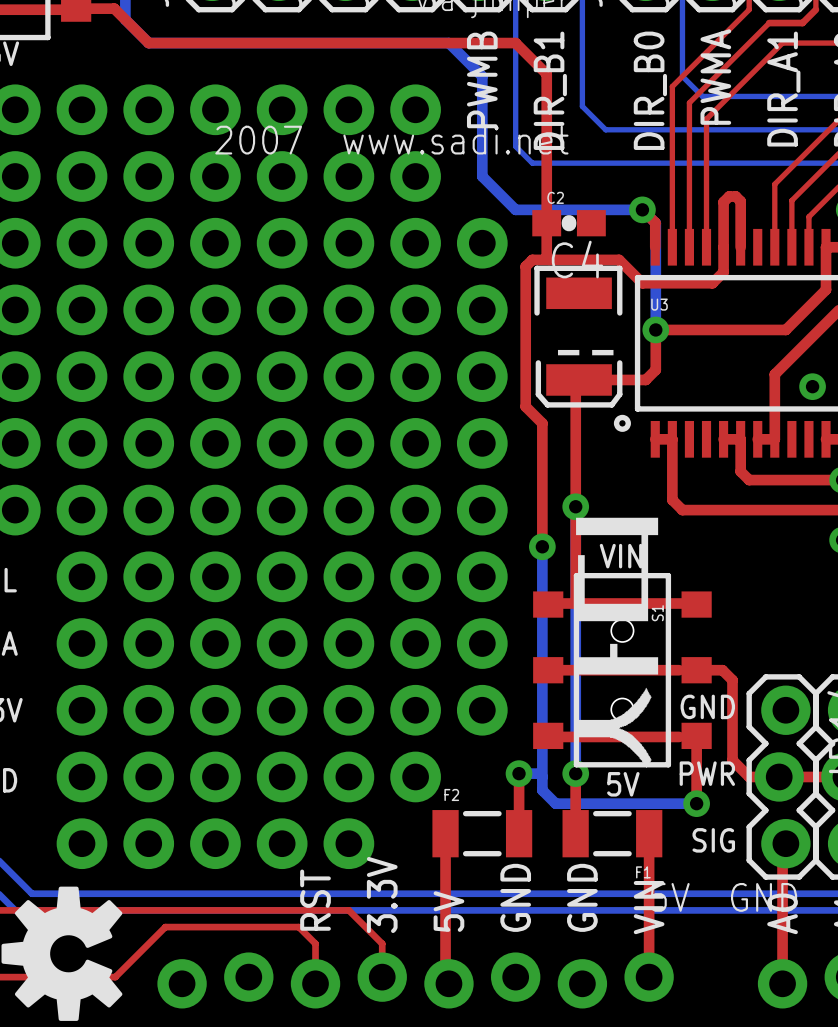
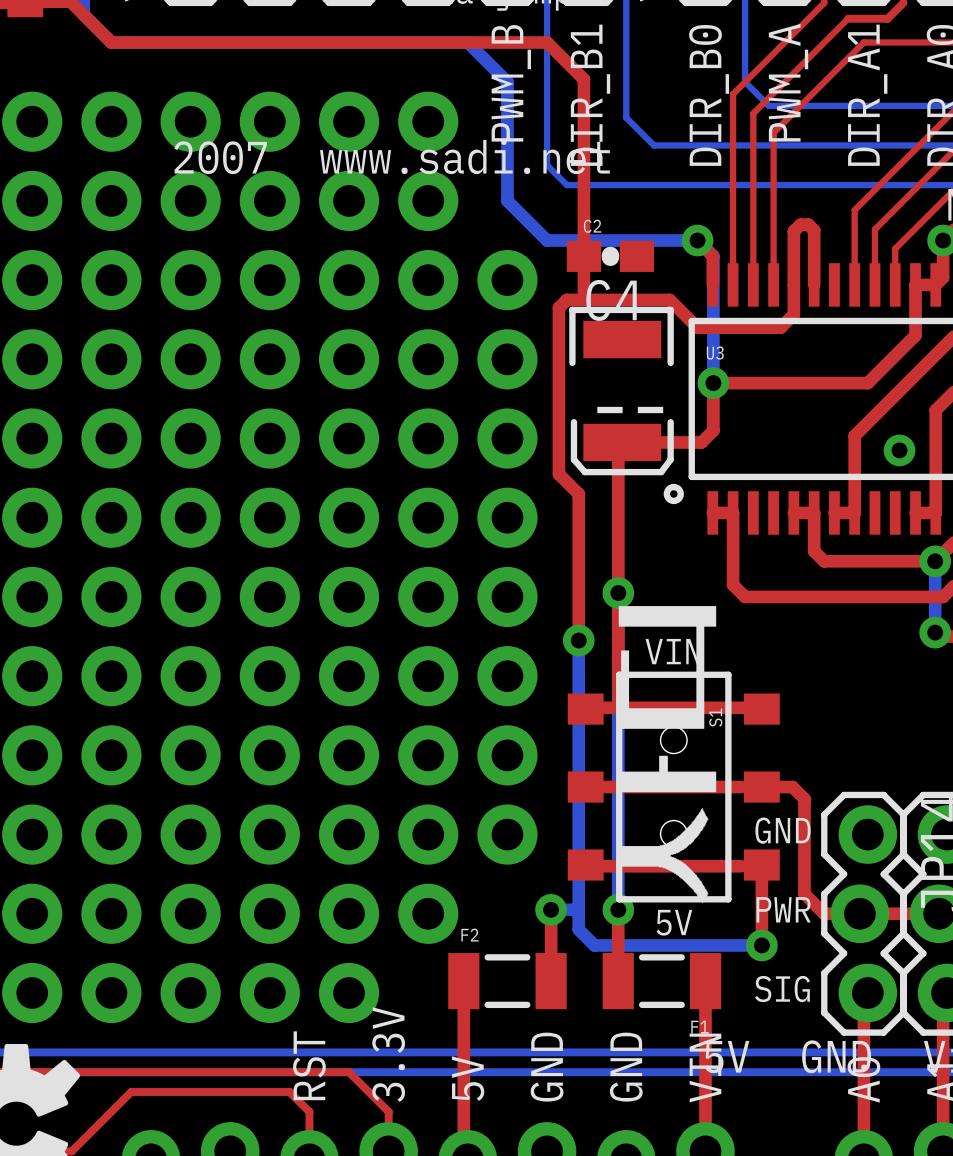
text: PWMA (715, 77) -> PWM_A (788, 82)
text: PWMB (482, 79) -> PWM_B (511, 83)

